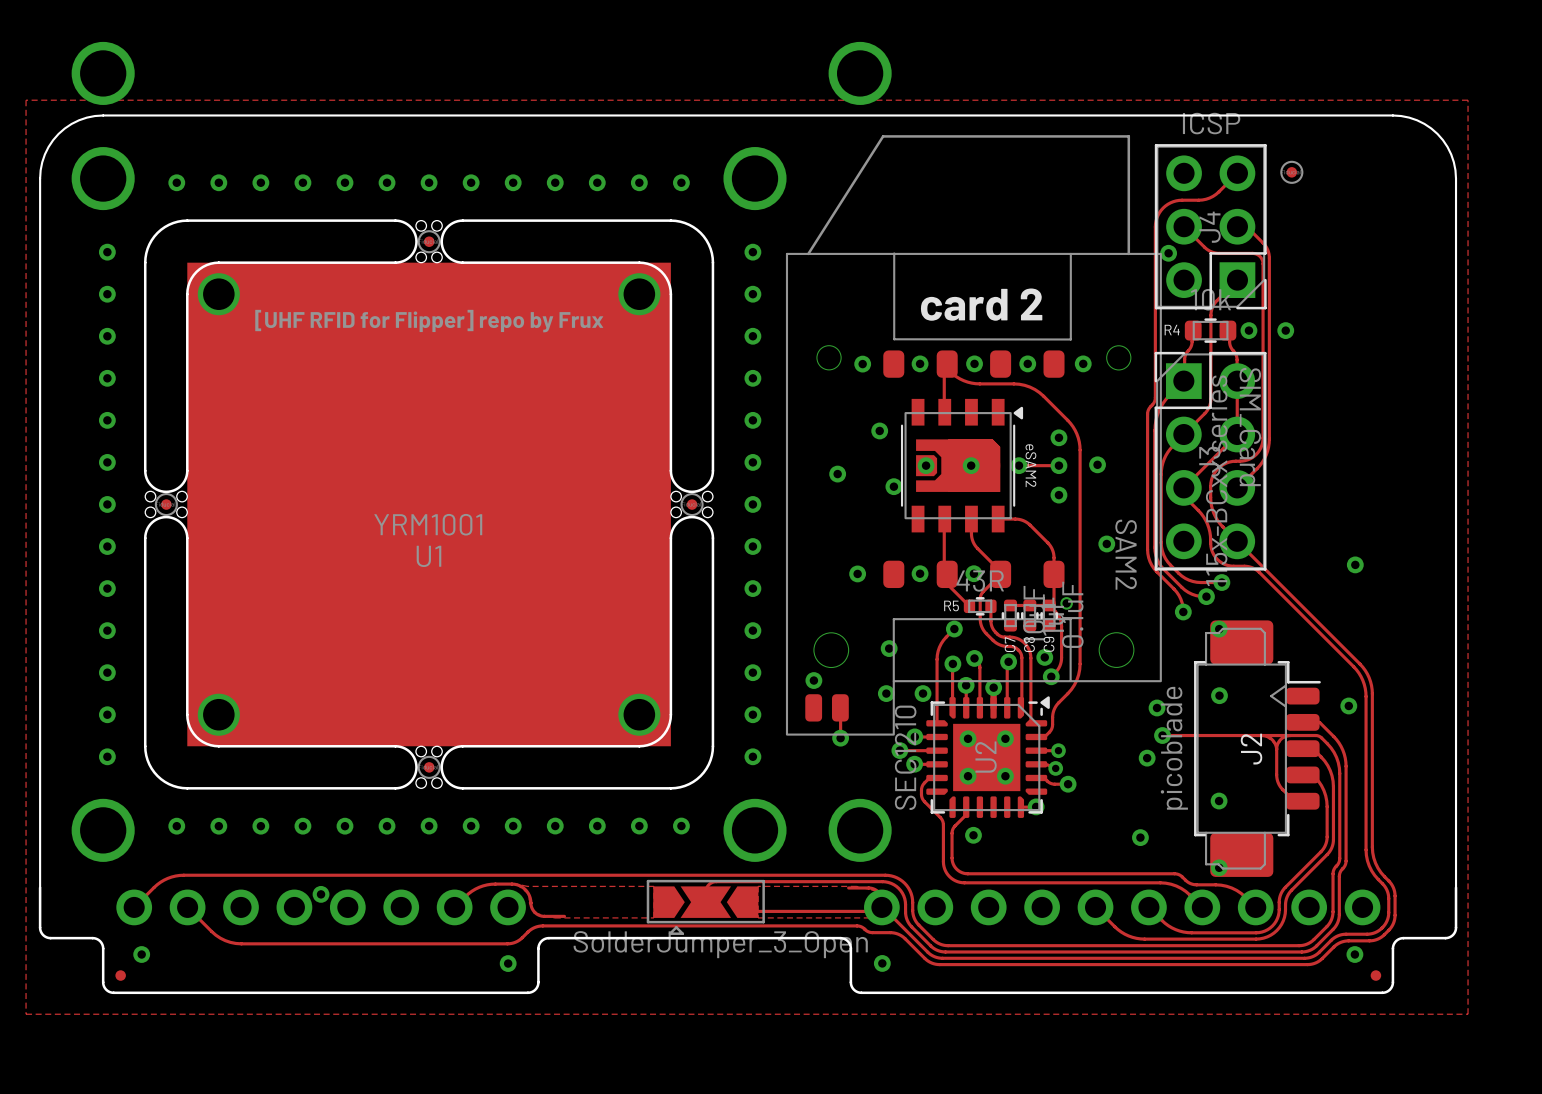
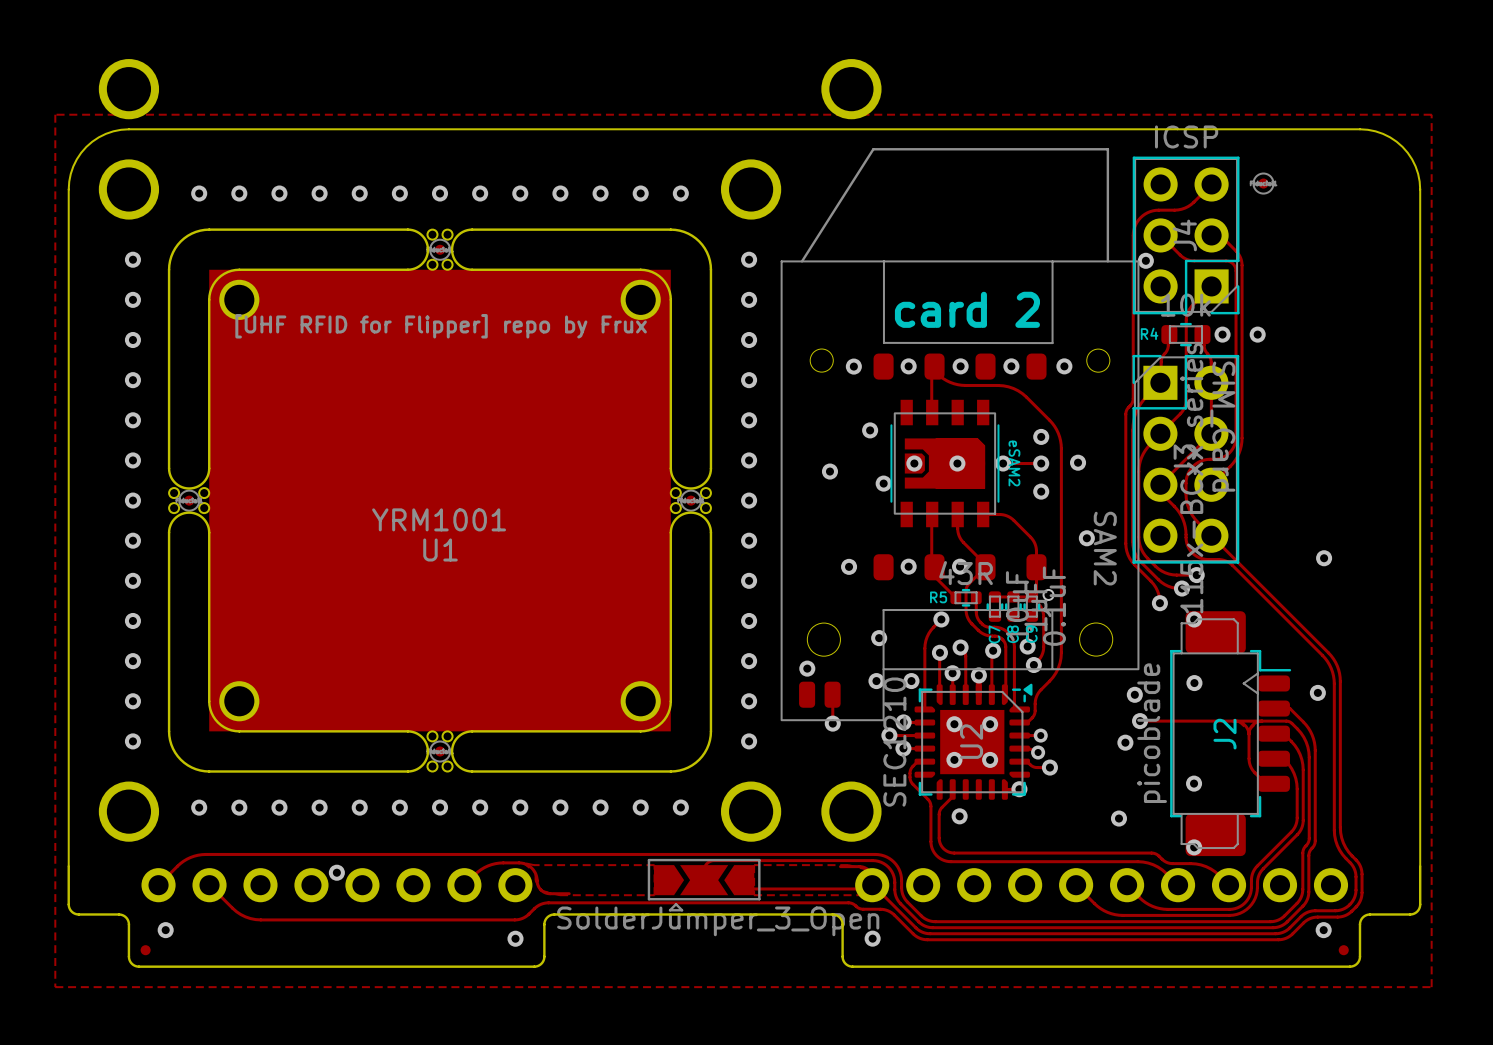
eSAM2 footprint: [900, 398, 1024, 533] -> [890, 399, 1000, 528]

